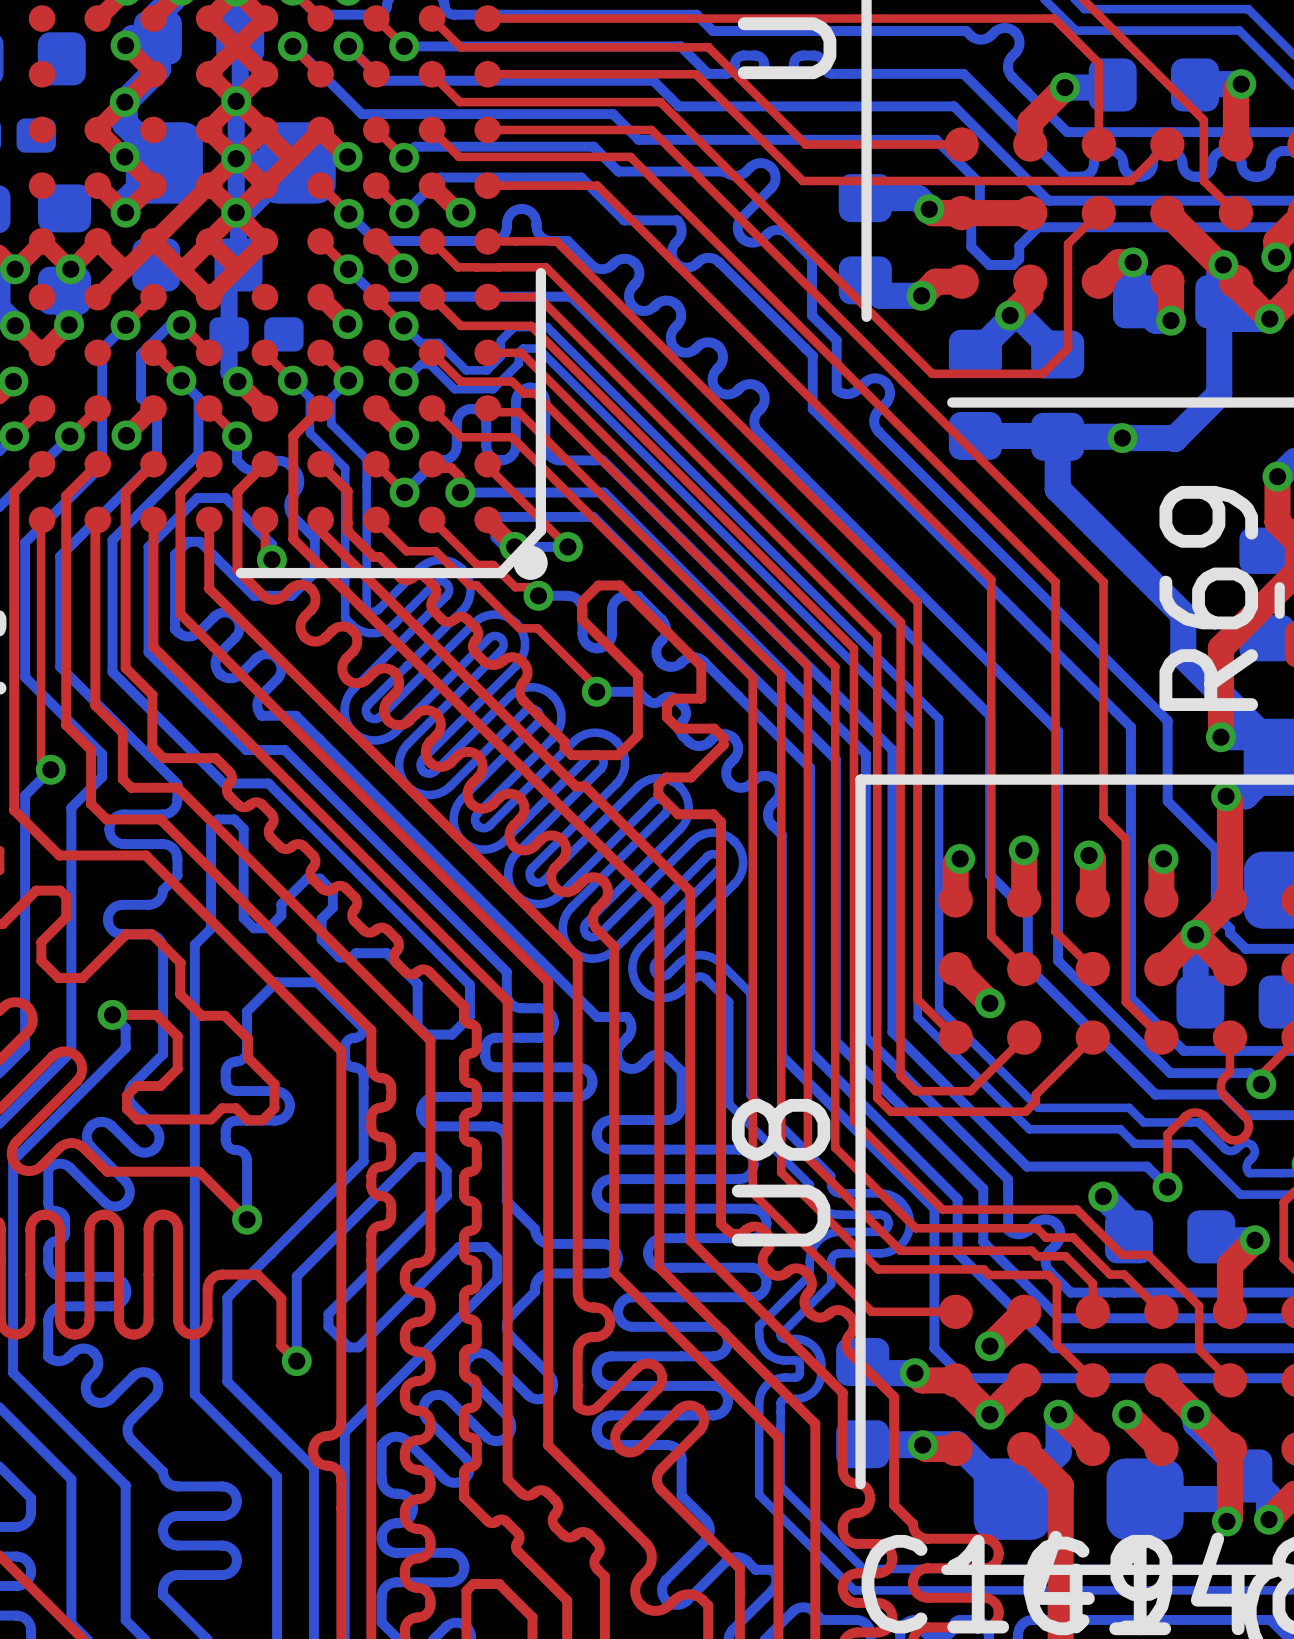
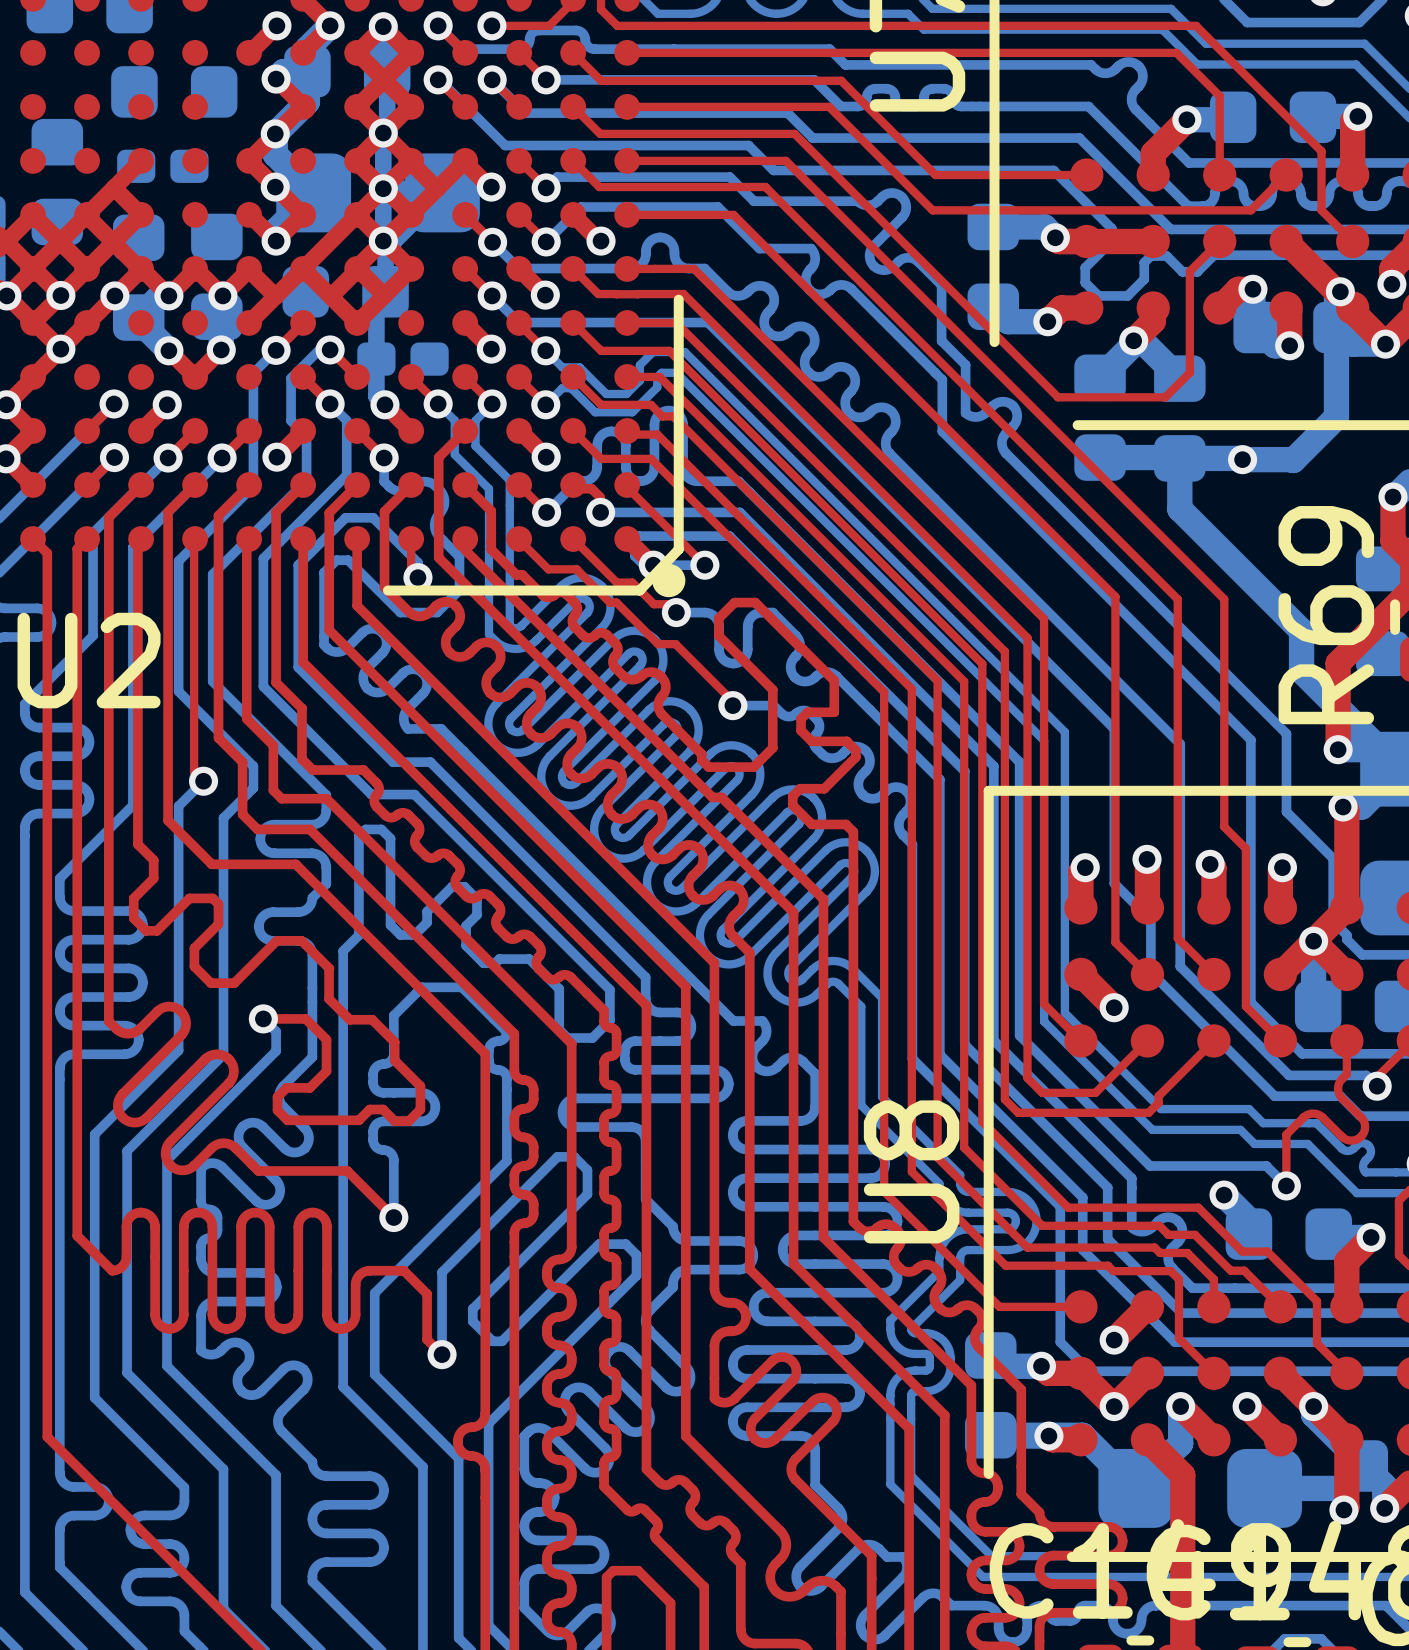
bottom track: (927, 139) (936, 139) (980, 183) (979, 213) (971, 222) (971, 246) (989, 264) (1013, 264) (1019, 258) (1019, 246) (1038, 227) (1092, 227) -> (1053, 170) (1111, 228) (1111, 241) (1085, 267) (1085, 282) (1098, 295) (1127, 295) (1144, 279) (1144, 262) (1150, 256) (1166, 256) (1182, 271) (1197, 271) (1214, 255)

